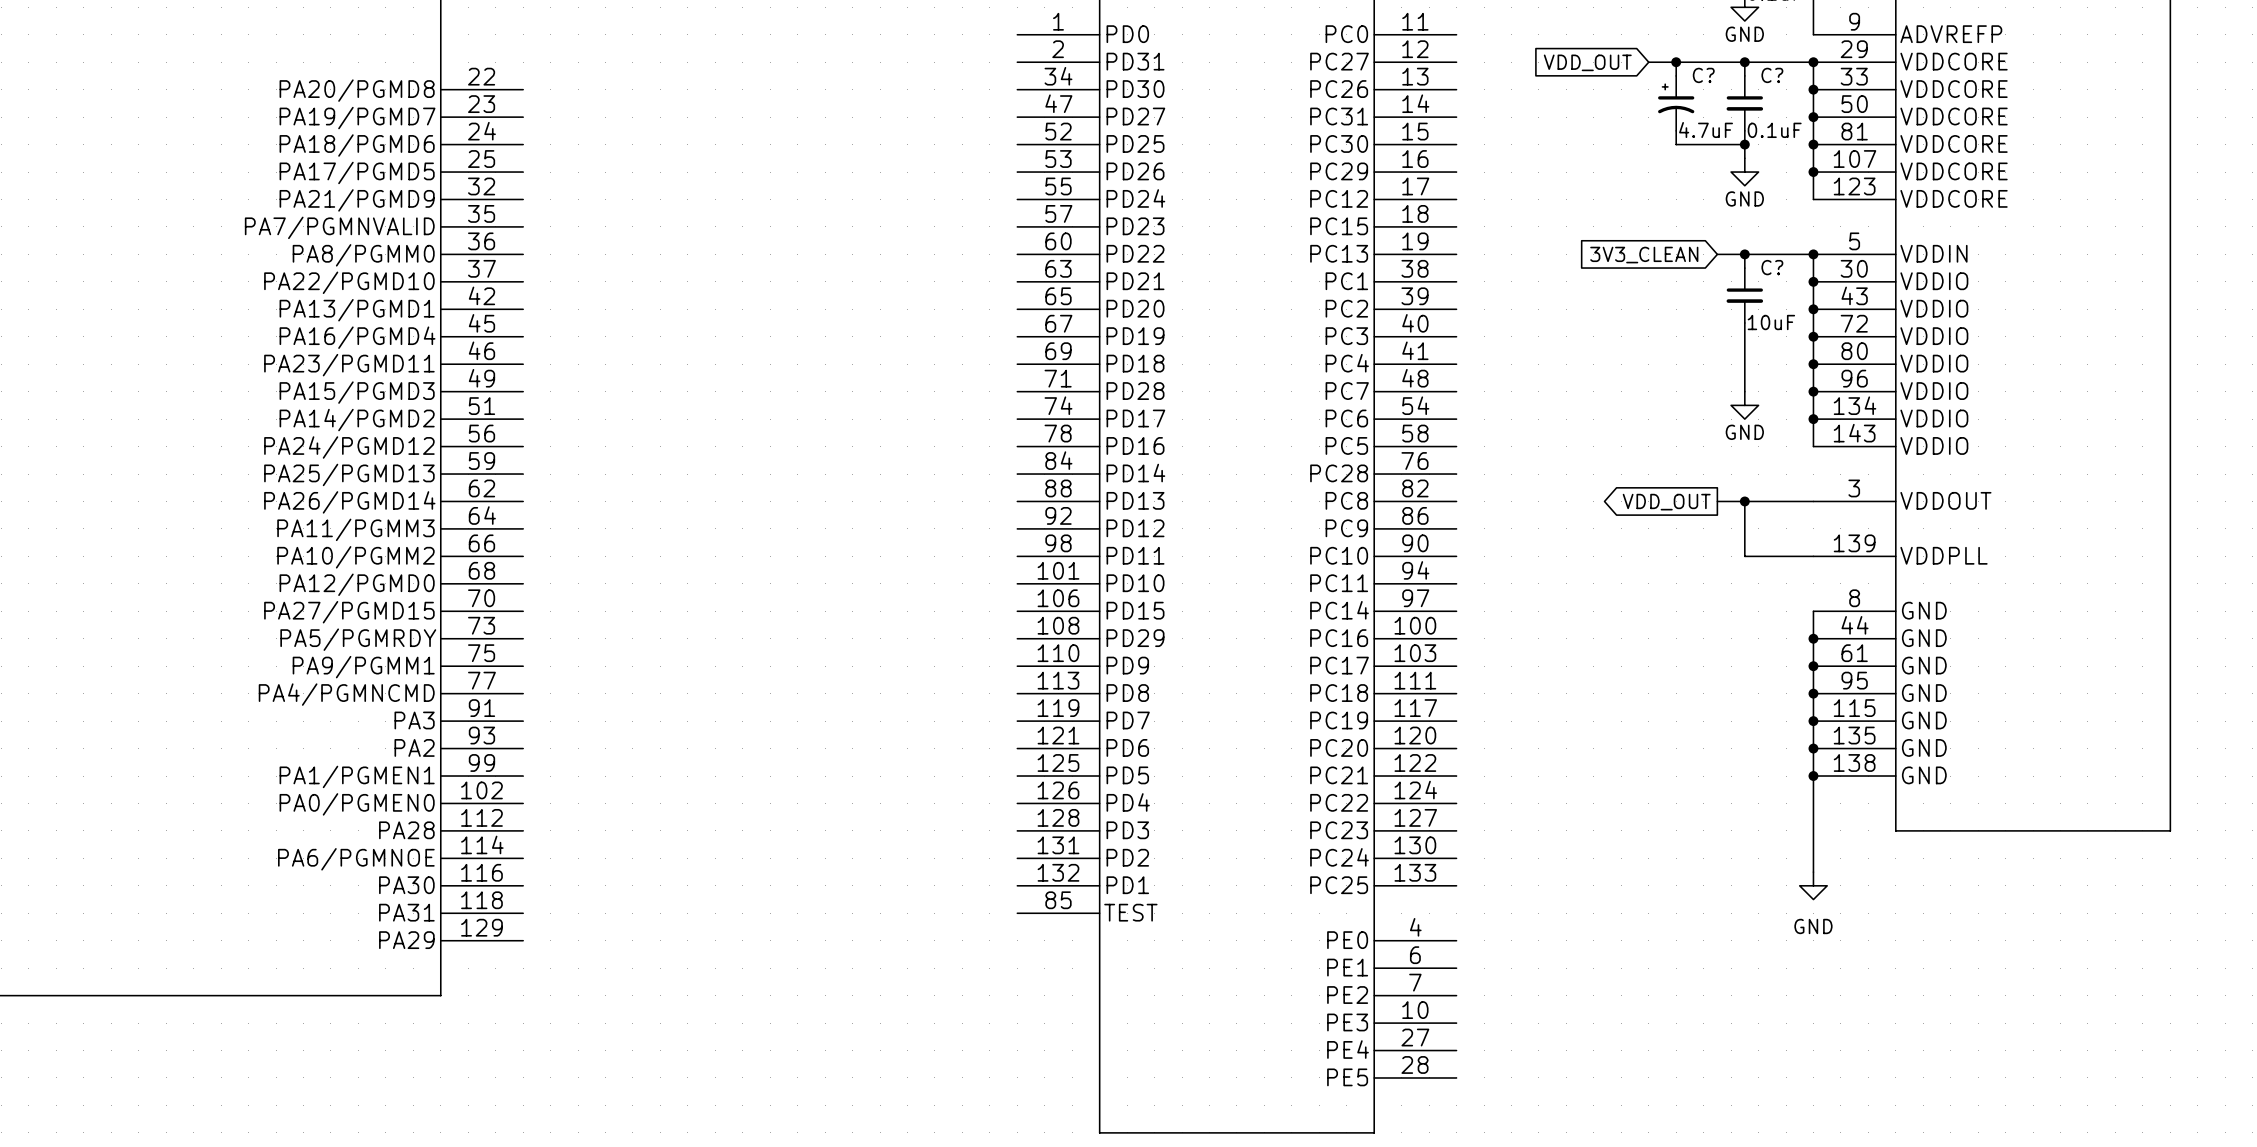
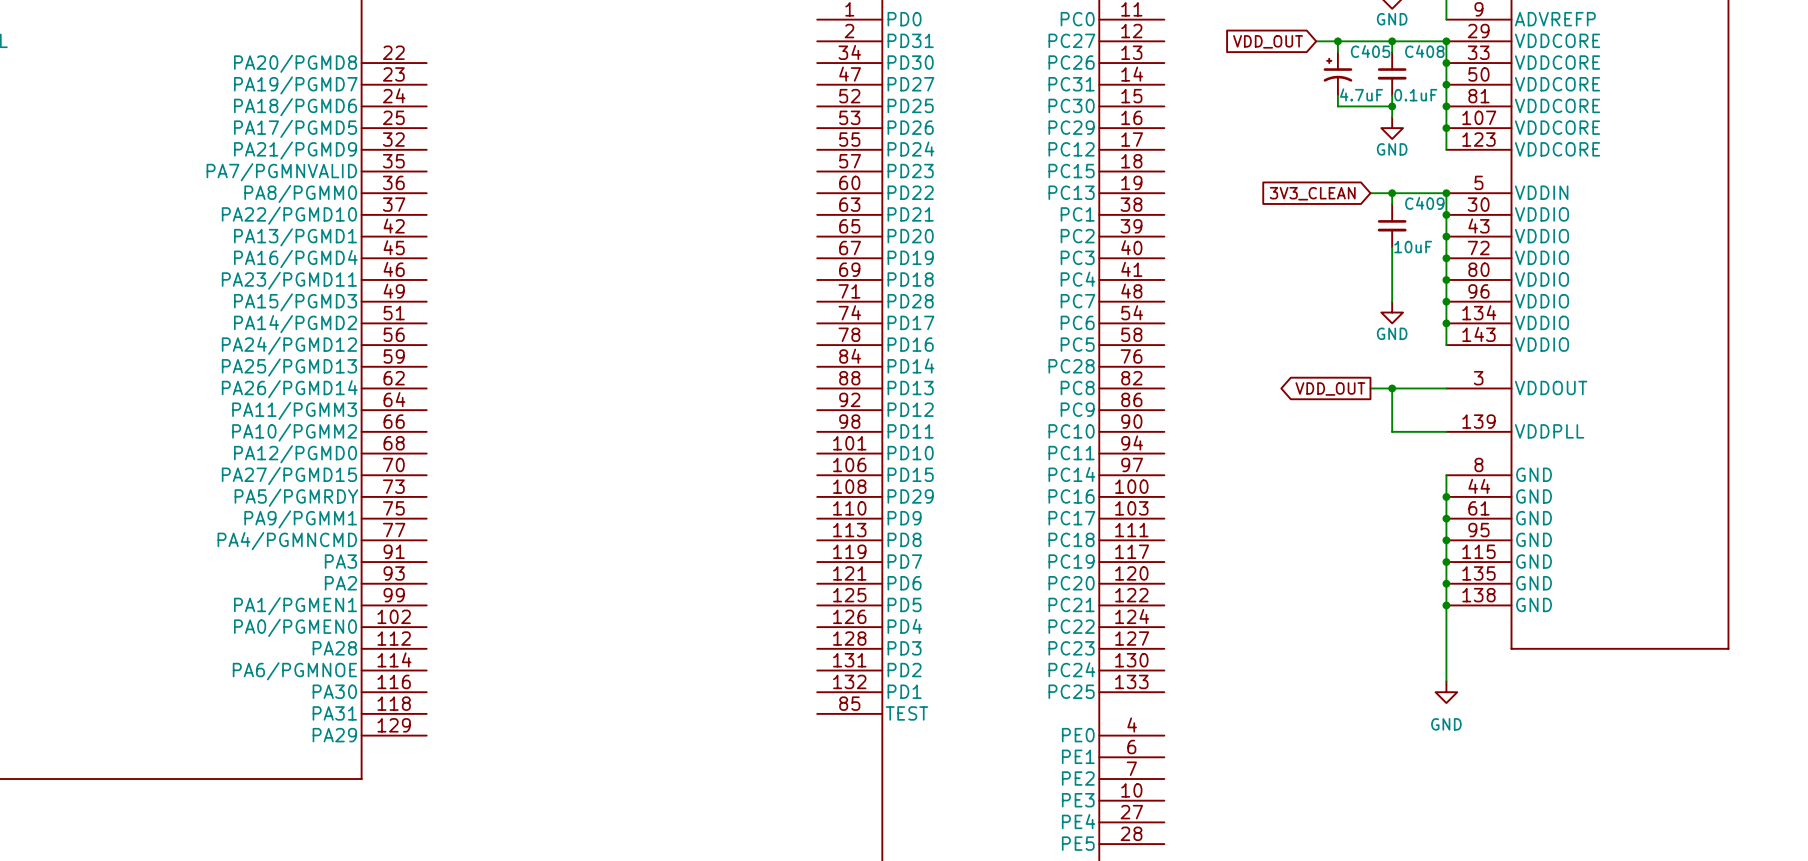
C? name: C? (1703, 75) -> C405 (1370, 51)
C? name: C? (1772, 75) -> C408 (1424, 51)
C? name: C? (1772, 267) -> C409 (1424, 203)

